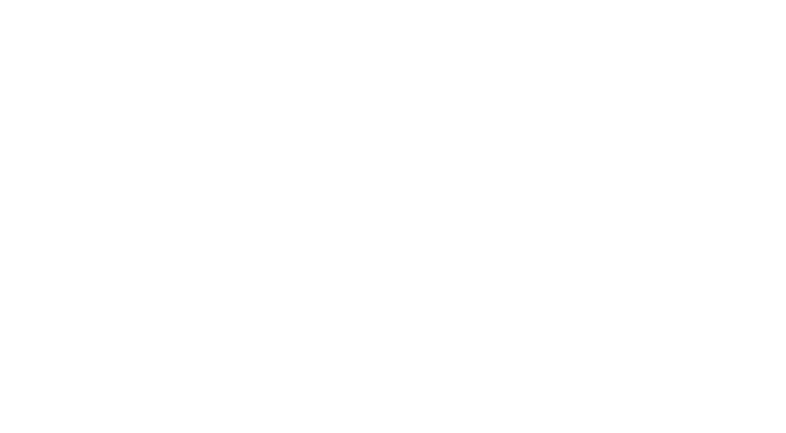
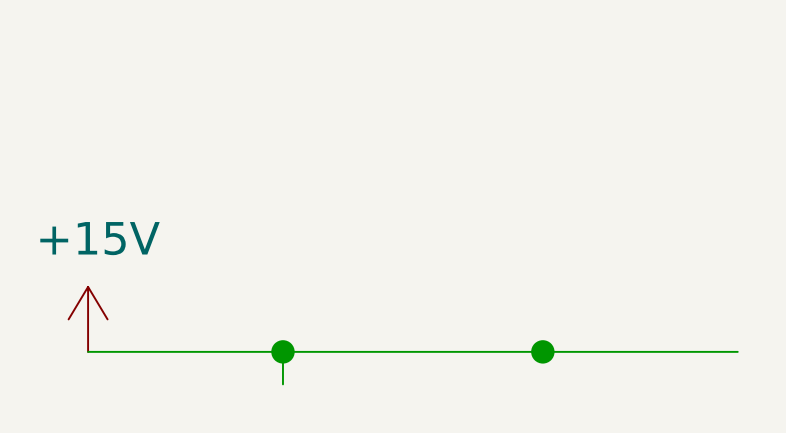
power symbol: none -> +15V (88, 319)
wire: none -> (88, 351) (737, 351)
wire: none -> (282, 351) (282, 384)
junction: none -> (282, 351)
junction: none -> (542, 351)

